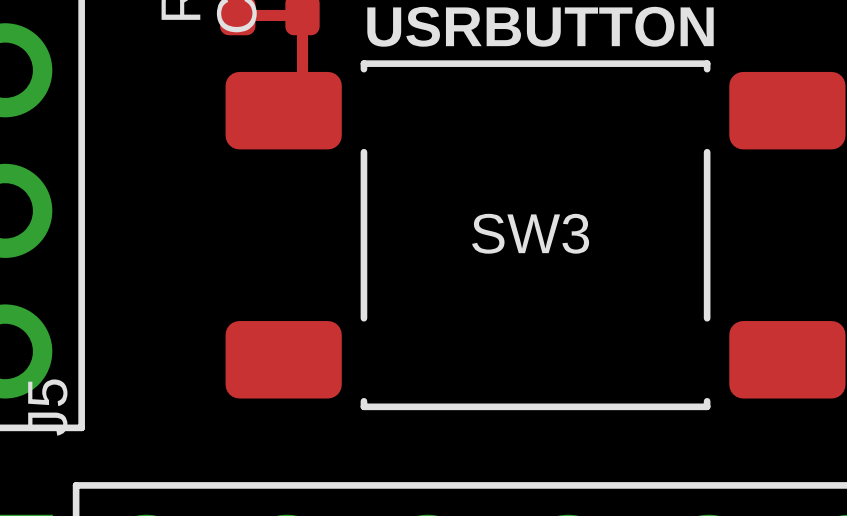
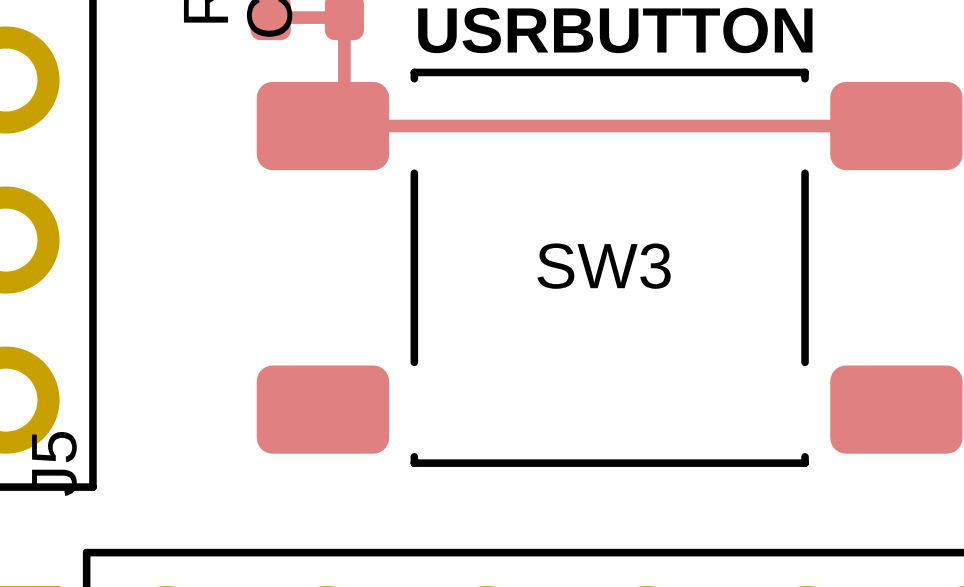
top track: none -> (322, 126) (896, 126)

